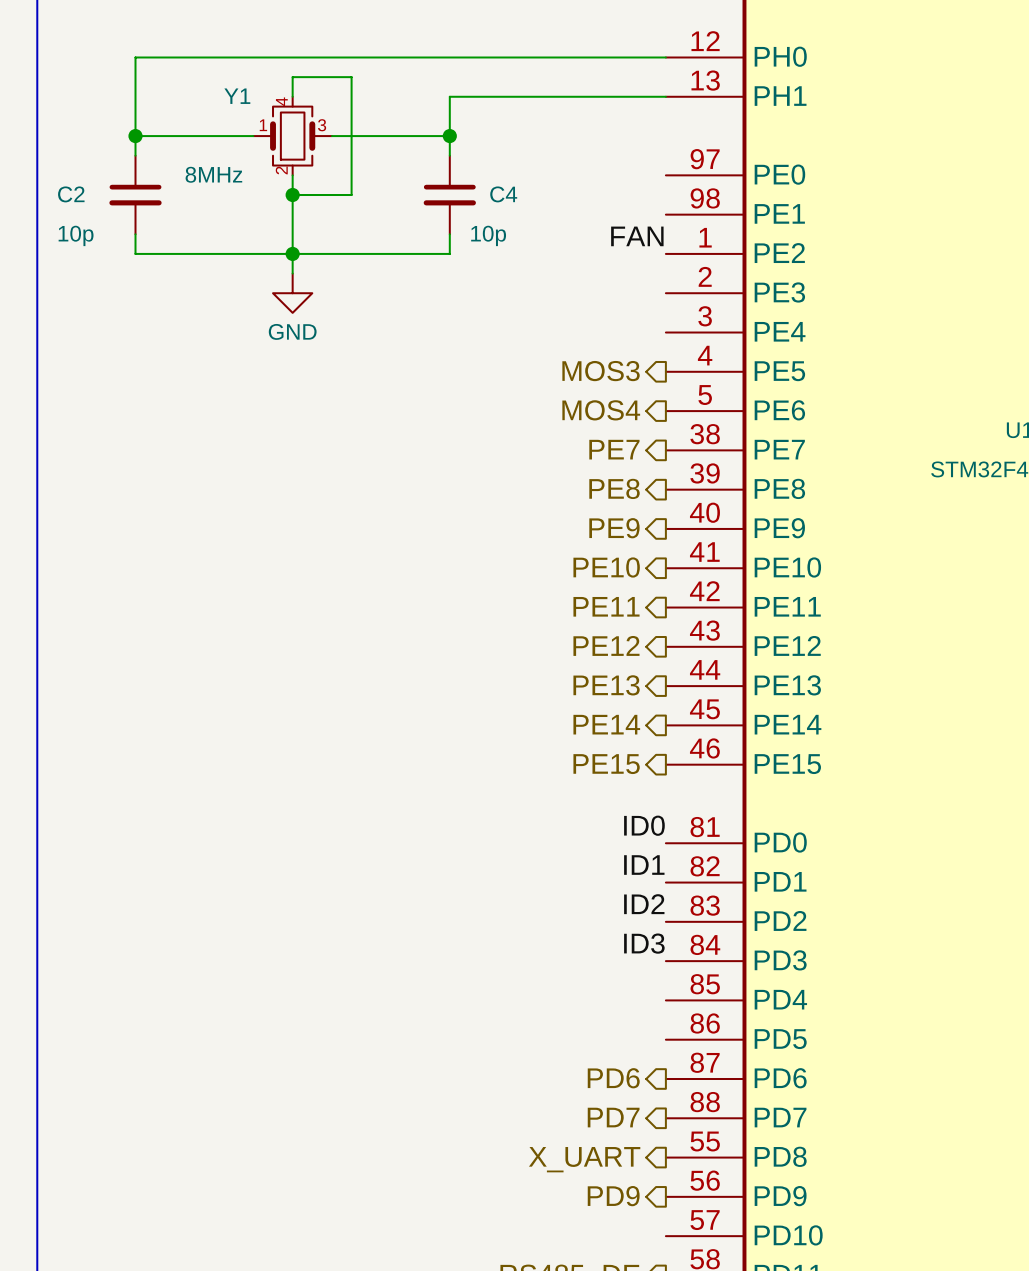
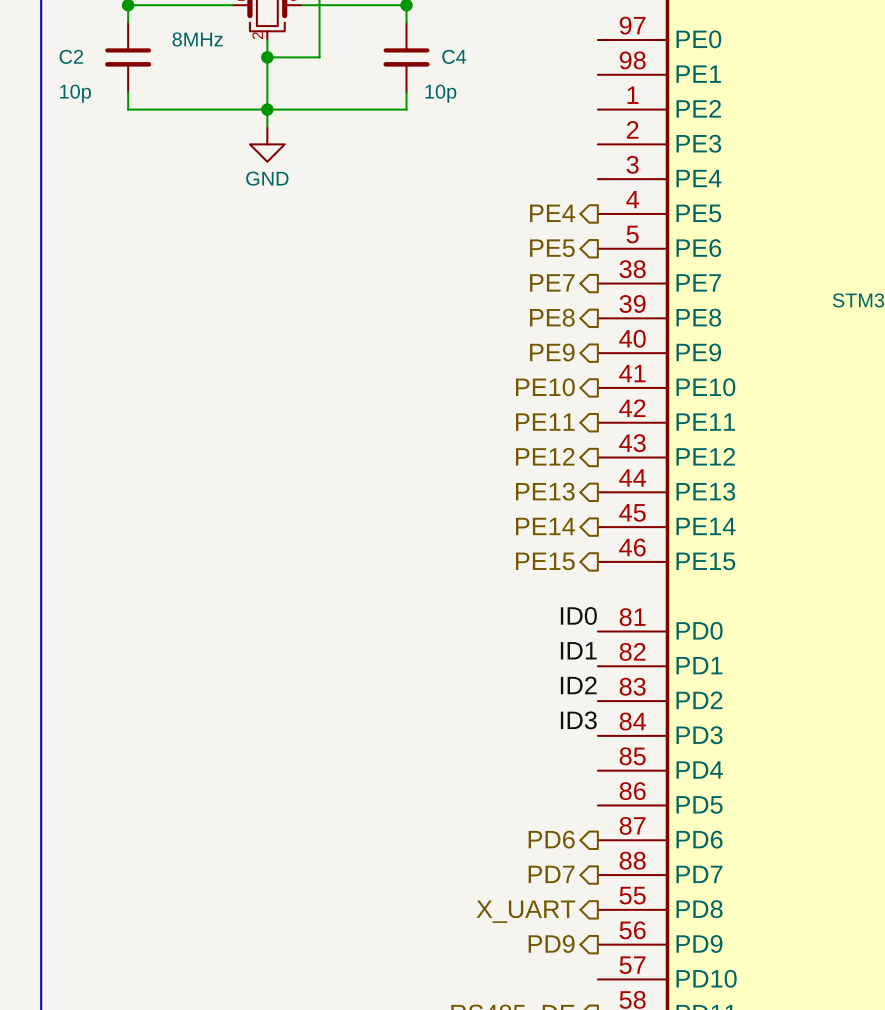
label: FAN (637, 236) -> none
hierarchical label: MOS3 (601, 371) -> PE4 (552, 213)
hierarchical label: MOS4 (601, 410) -> PE5 (552, 248)

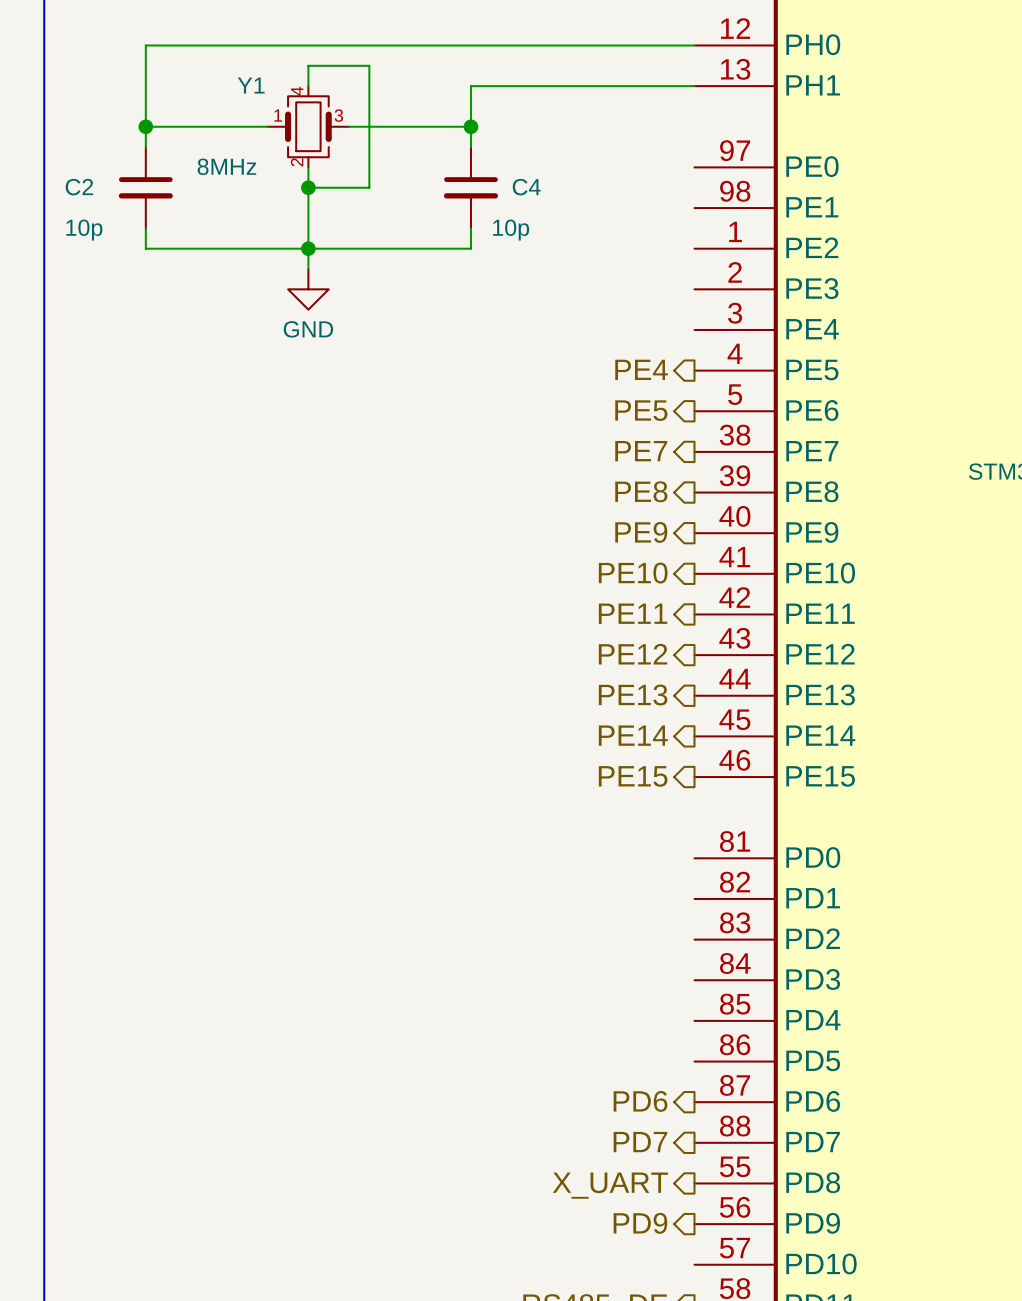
label: ID0 (578, 615) -> none
label: ID1 (578, 650) -> none
label: ID2 (578, 685) -> none
label: ID3 (578, 720) -> none

